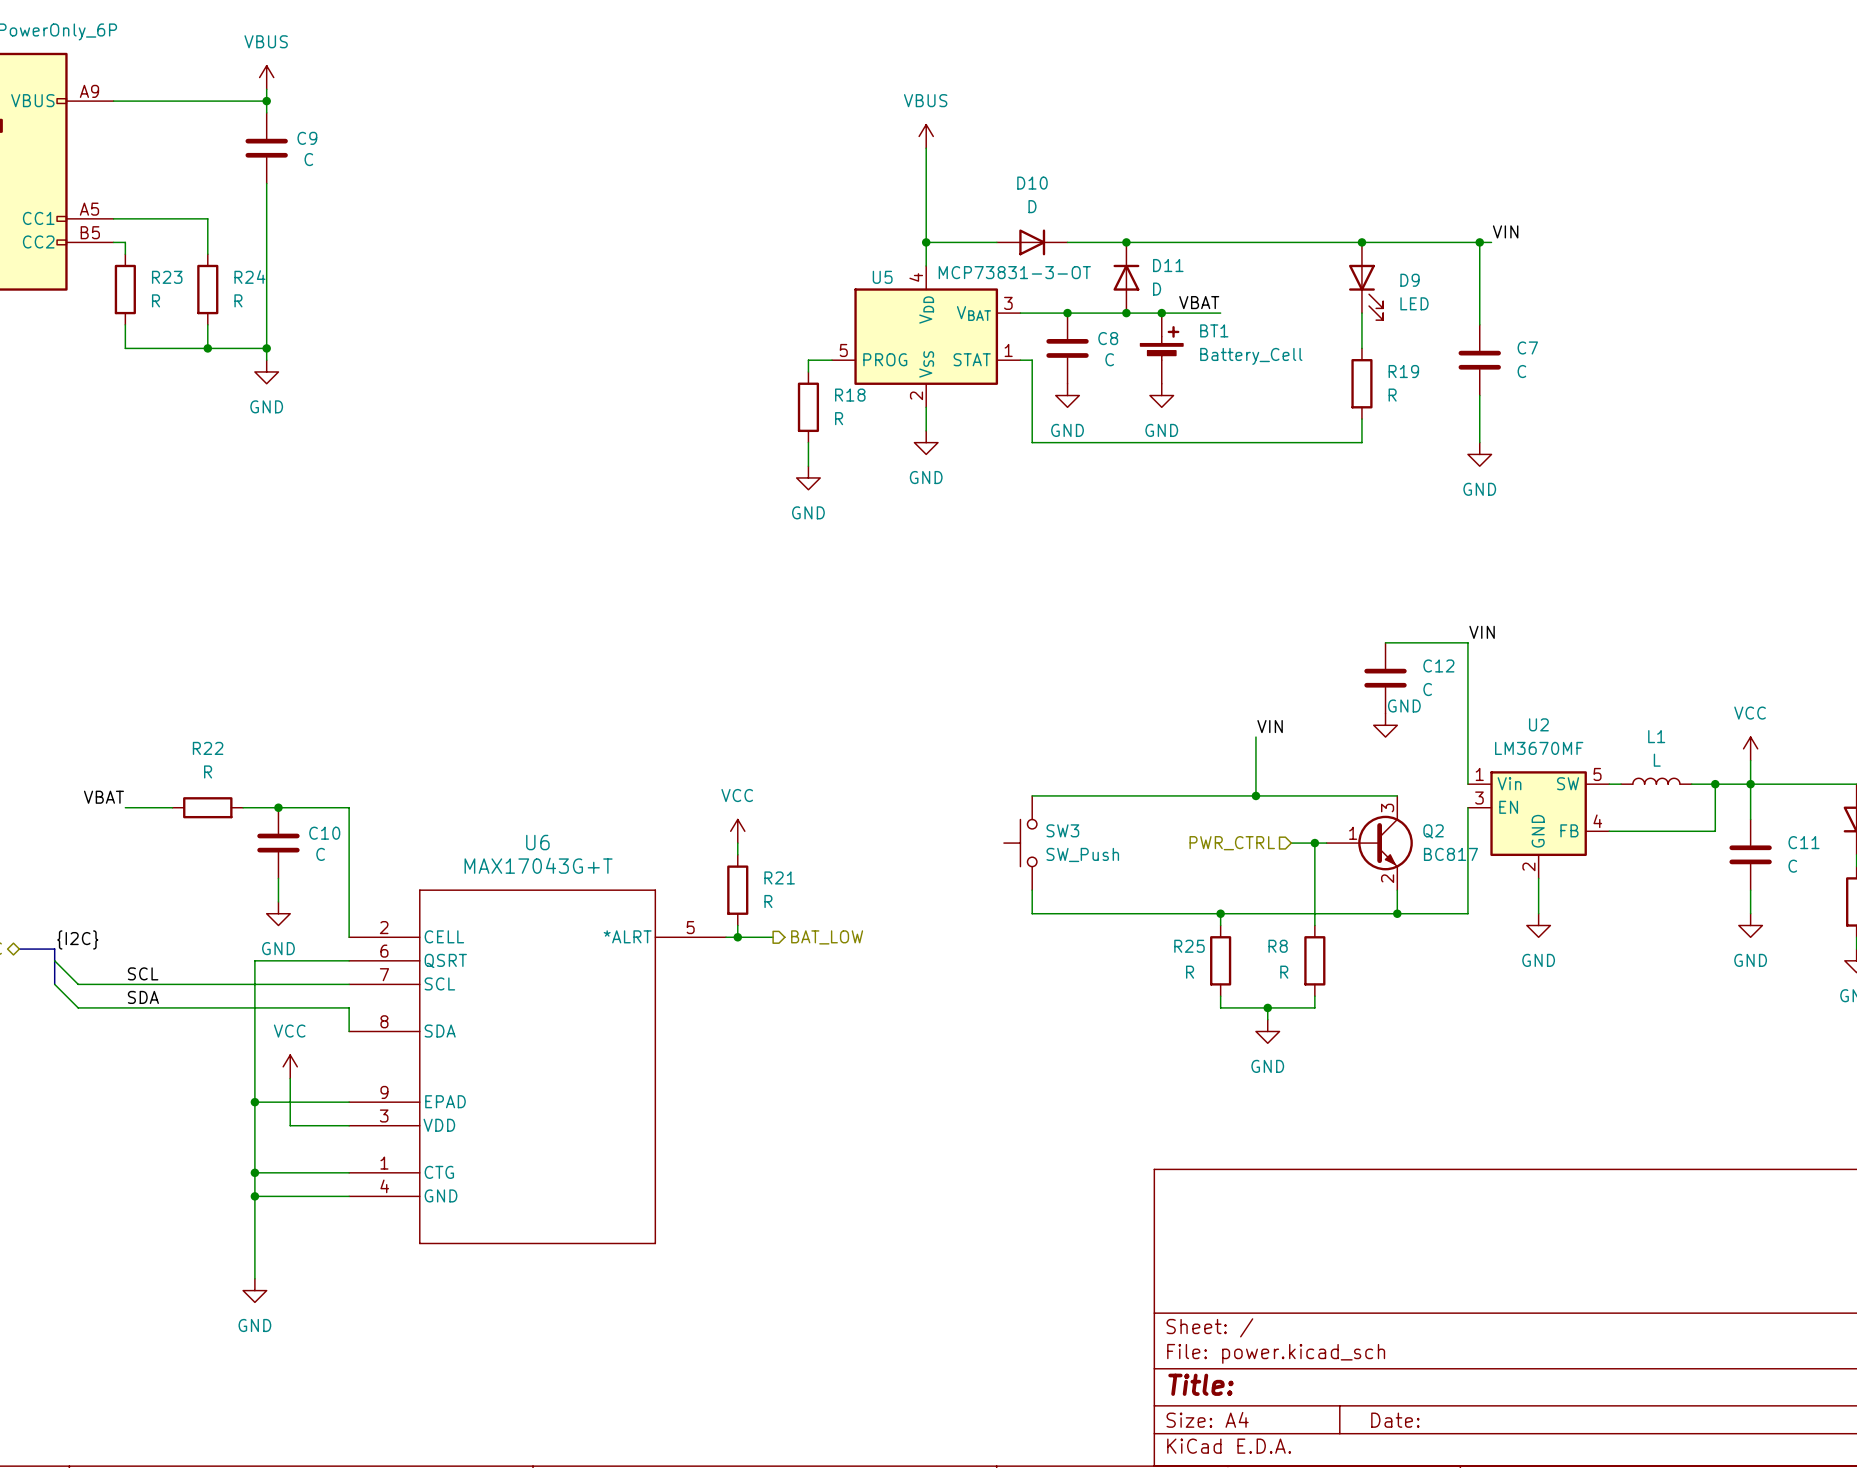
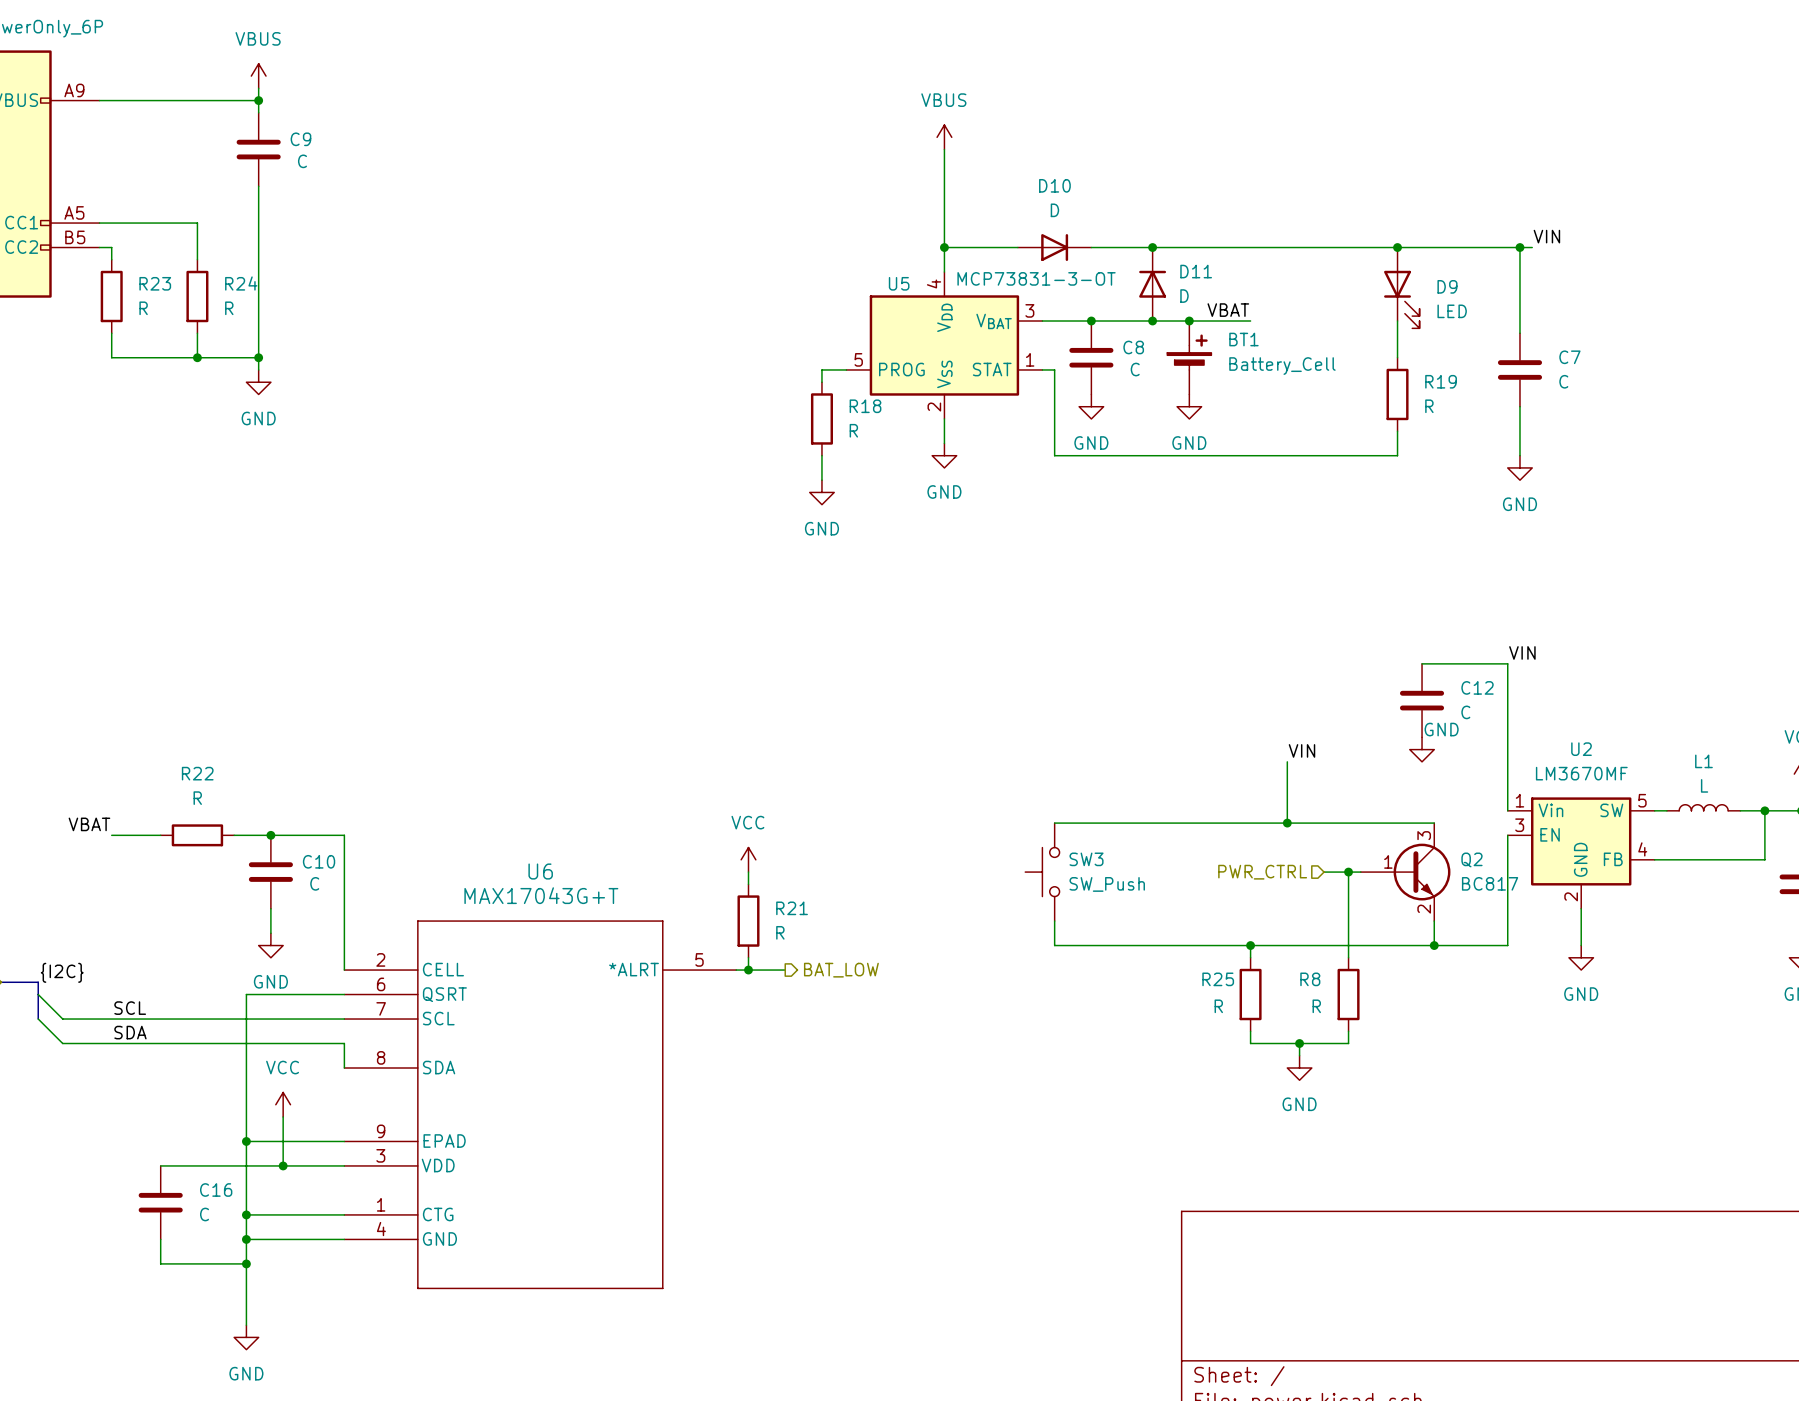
wire: none -> (160, 1165) (283, 1165)
junction: none -> (283, 1165)
C16: none -> C (160, 1202)
wire: none -> (160, 1239) (160, 1263) (246, 1263)
junction: none -> (246, 1263)

